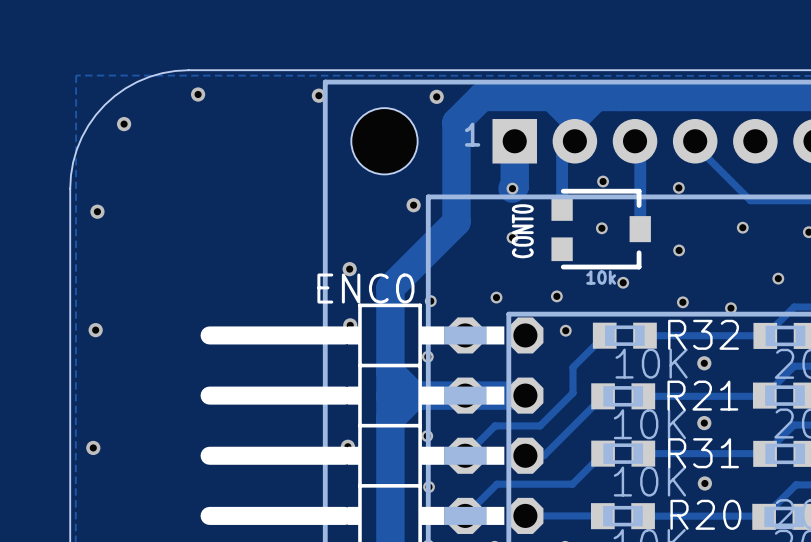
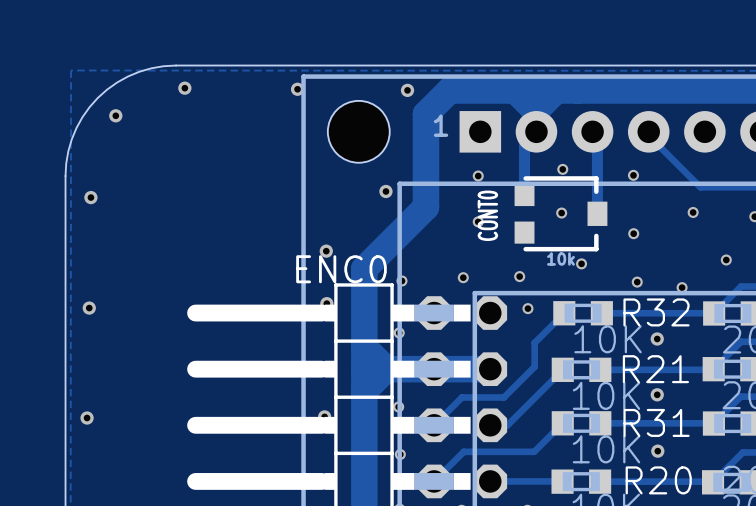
track: (514, 141) (514, 186) (512, 188) -> none

